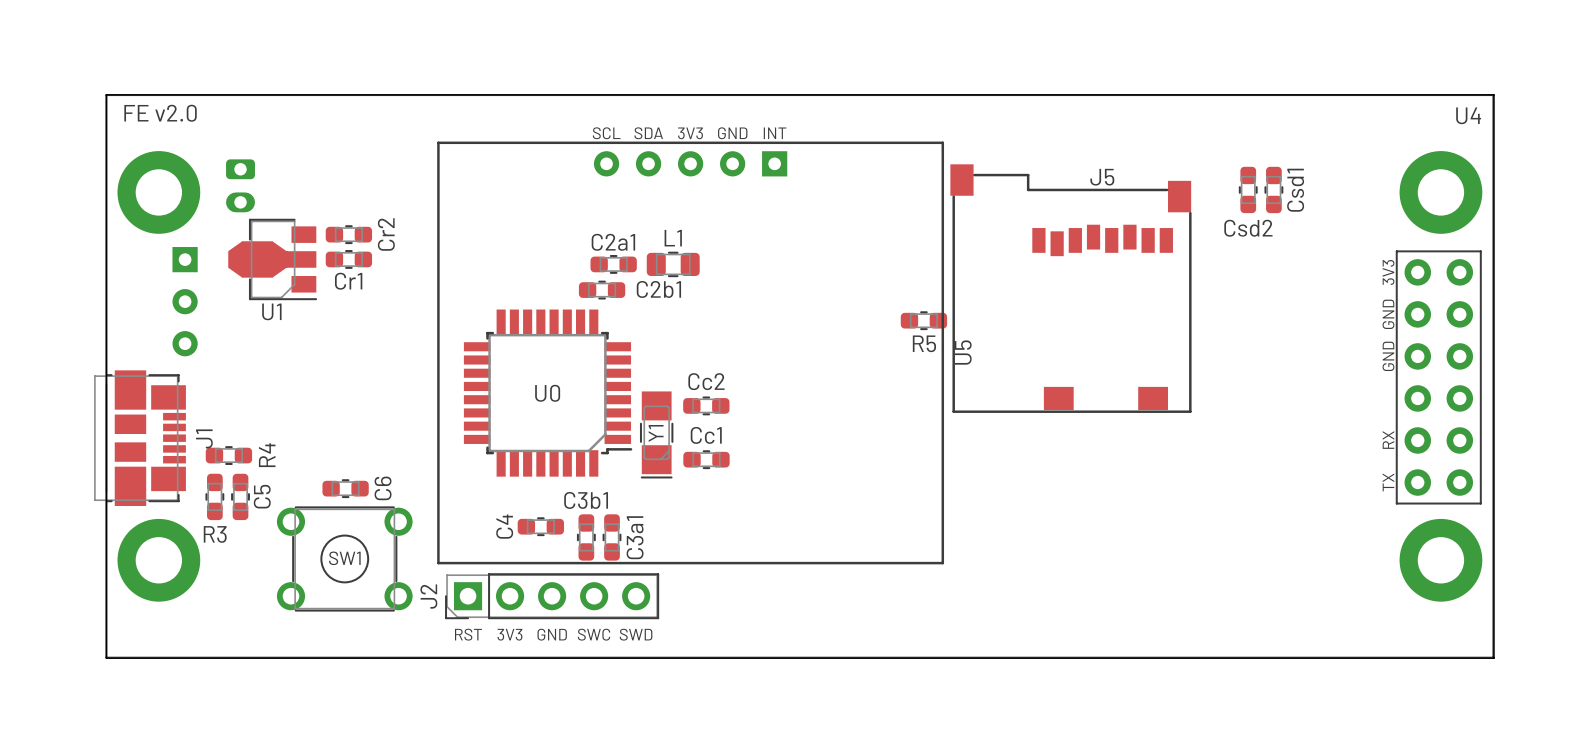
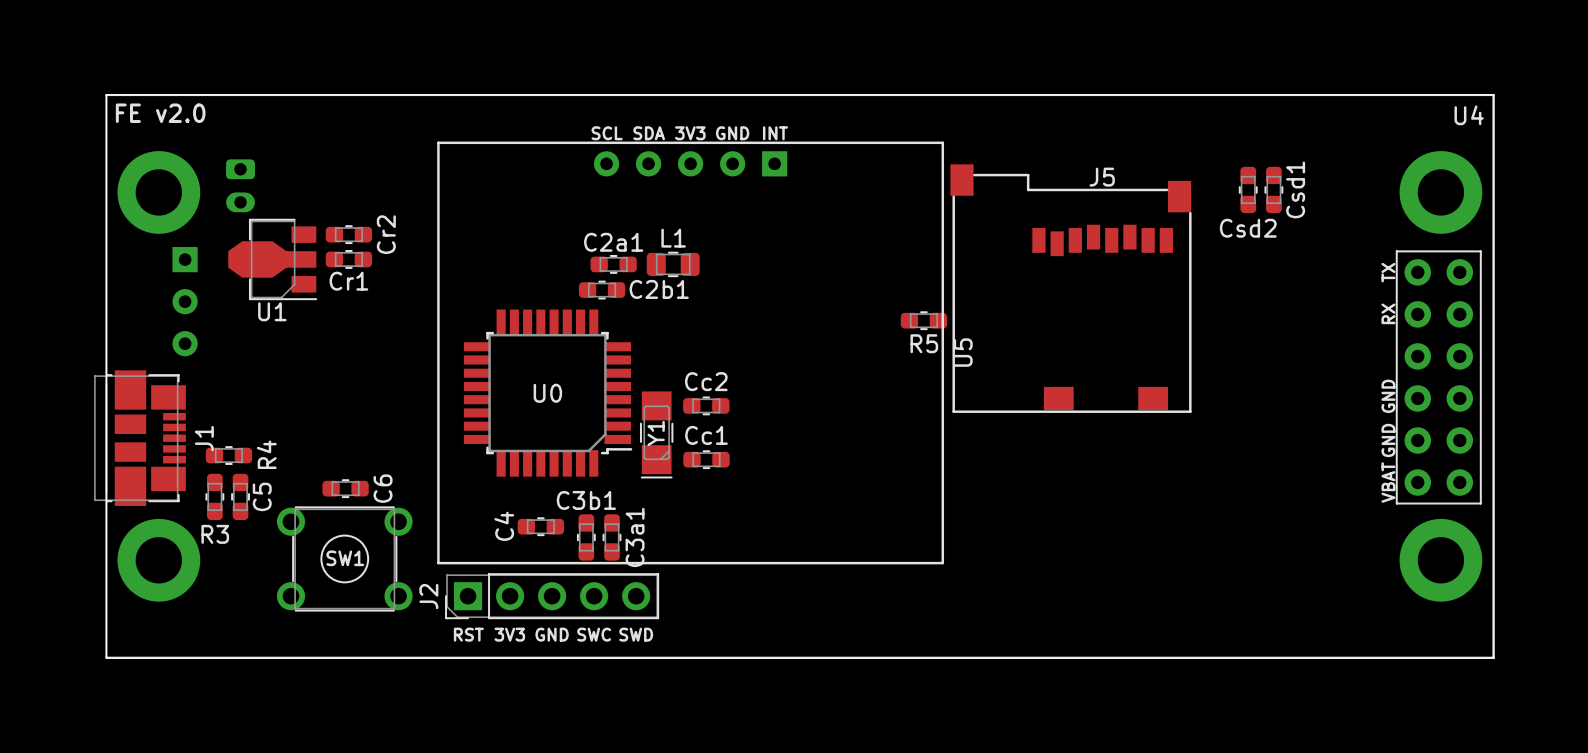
text: 3V3 (1388, 272) -> TX (1388, 272)
text: GND (1388, 314) -> RX (1388, 313)
text position: GND (1388, 356) -> GND (1388, 396)
text: RX (1388, 440) -> GND (1388, 440)
text: TX (1388, 482) -> VBAT (1388, 482)

